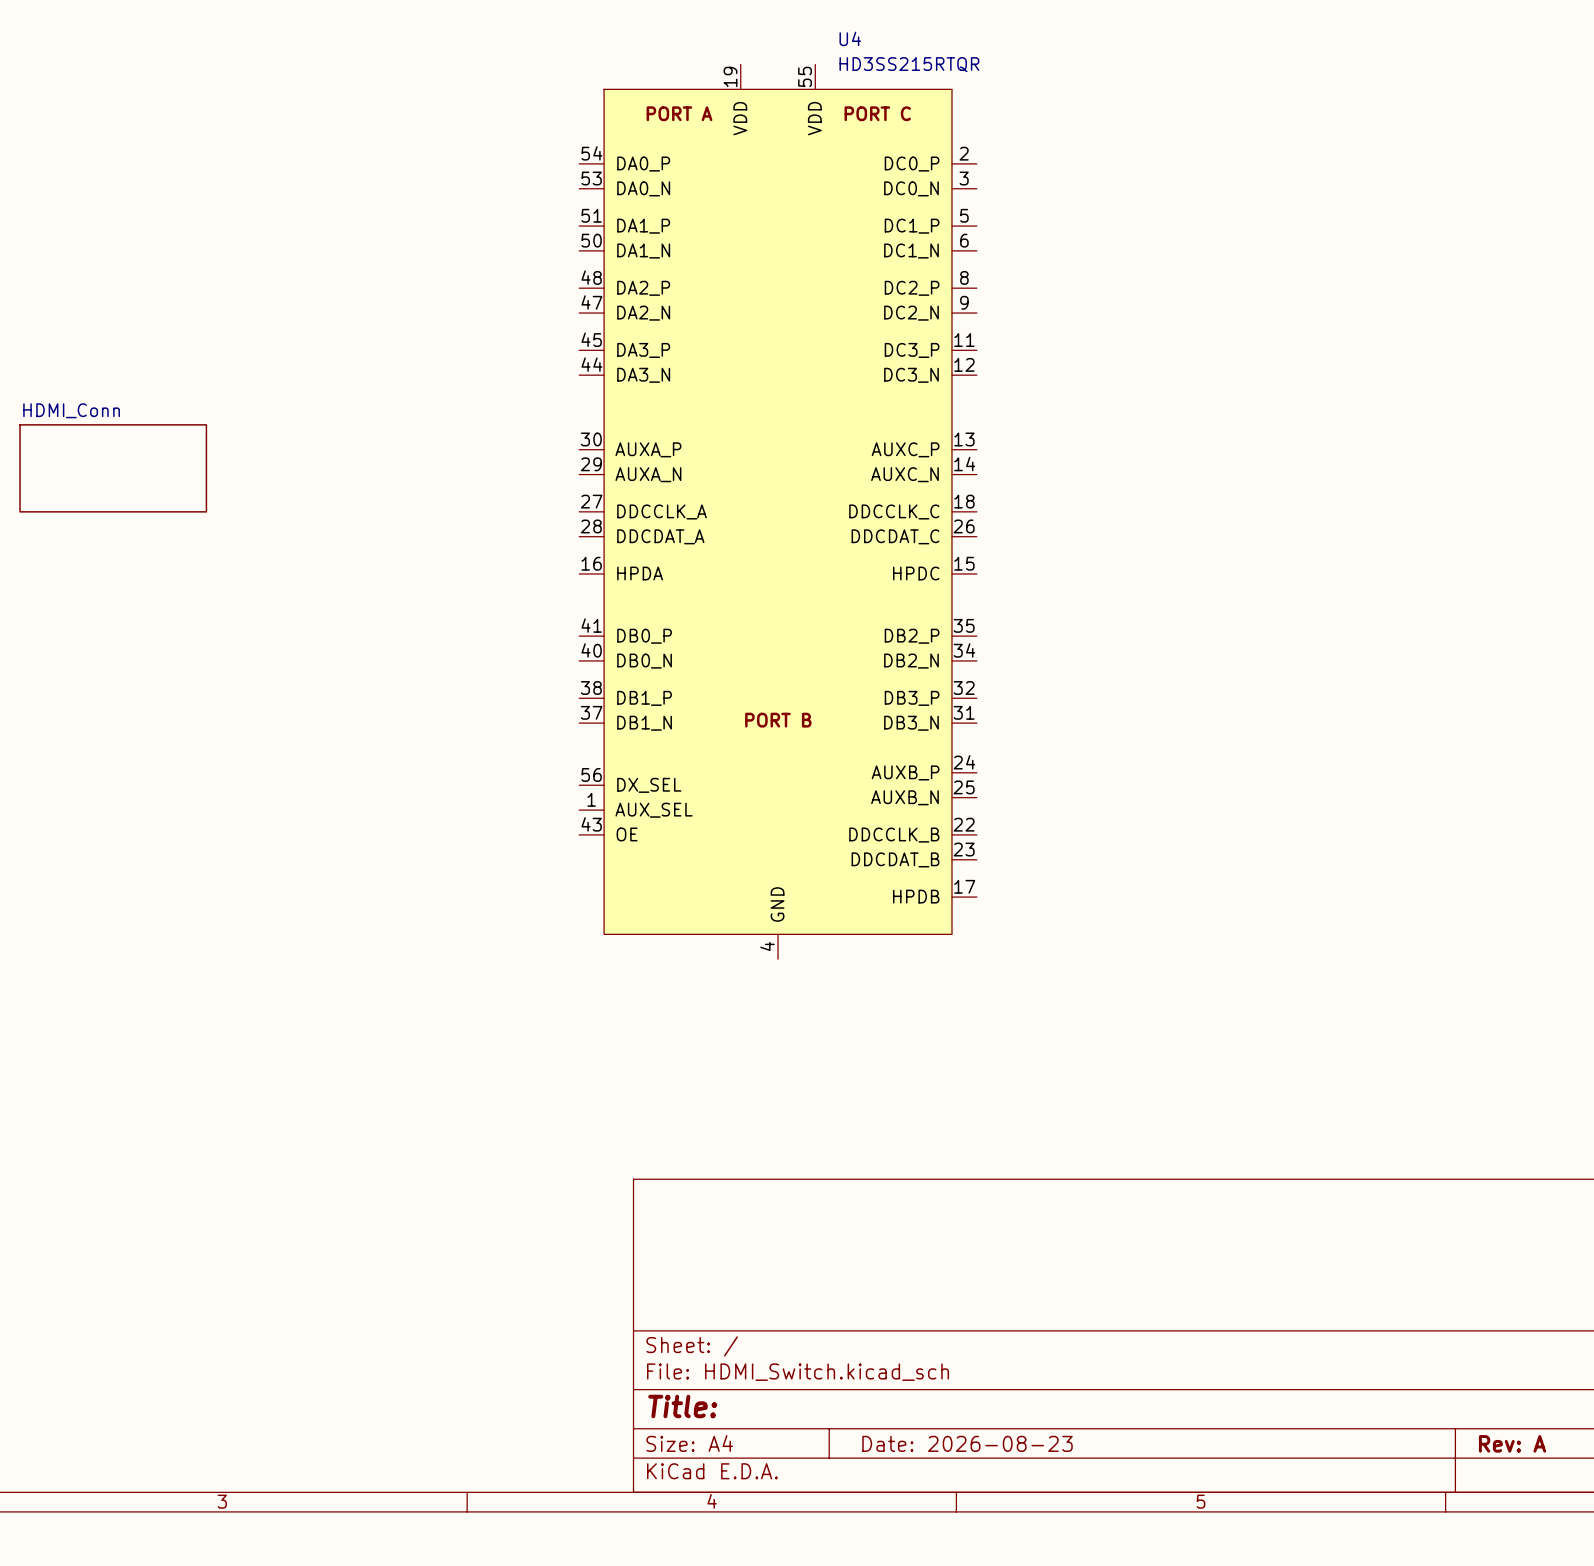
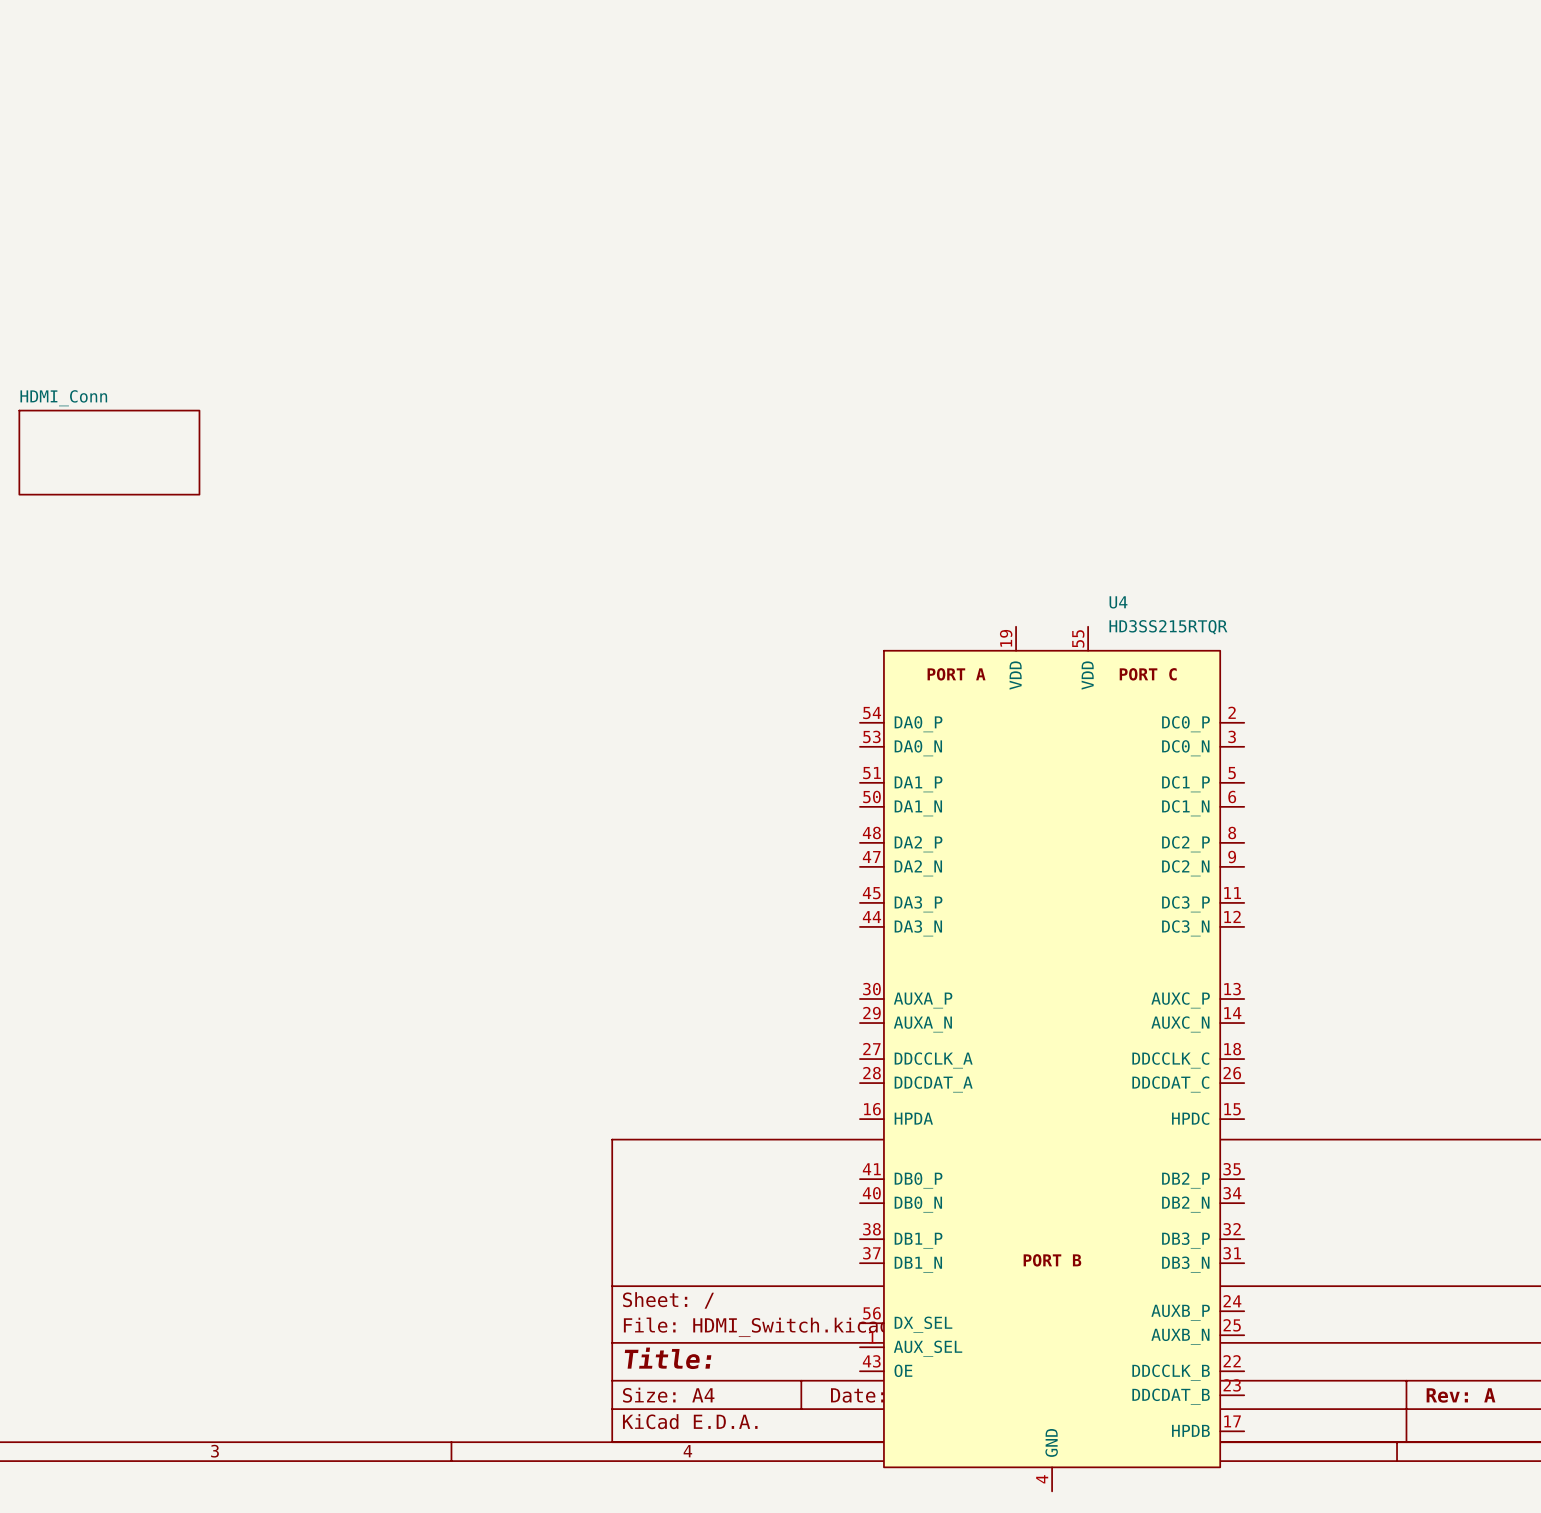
U4 position: (778, 511) -> (1052, 1059)

